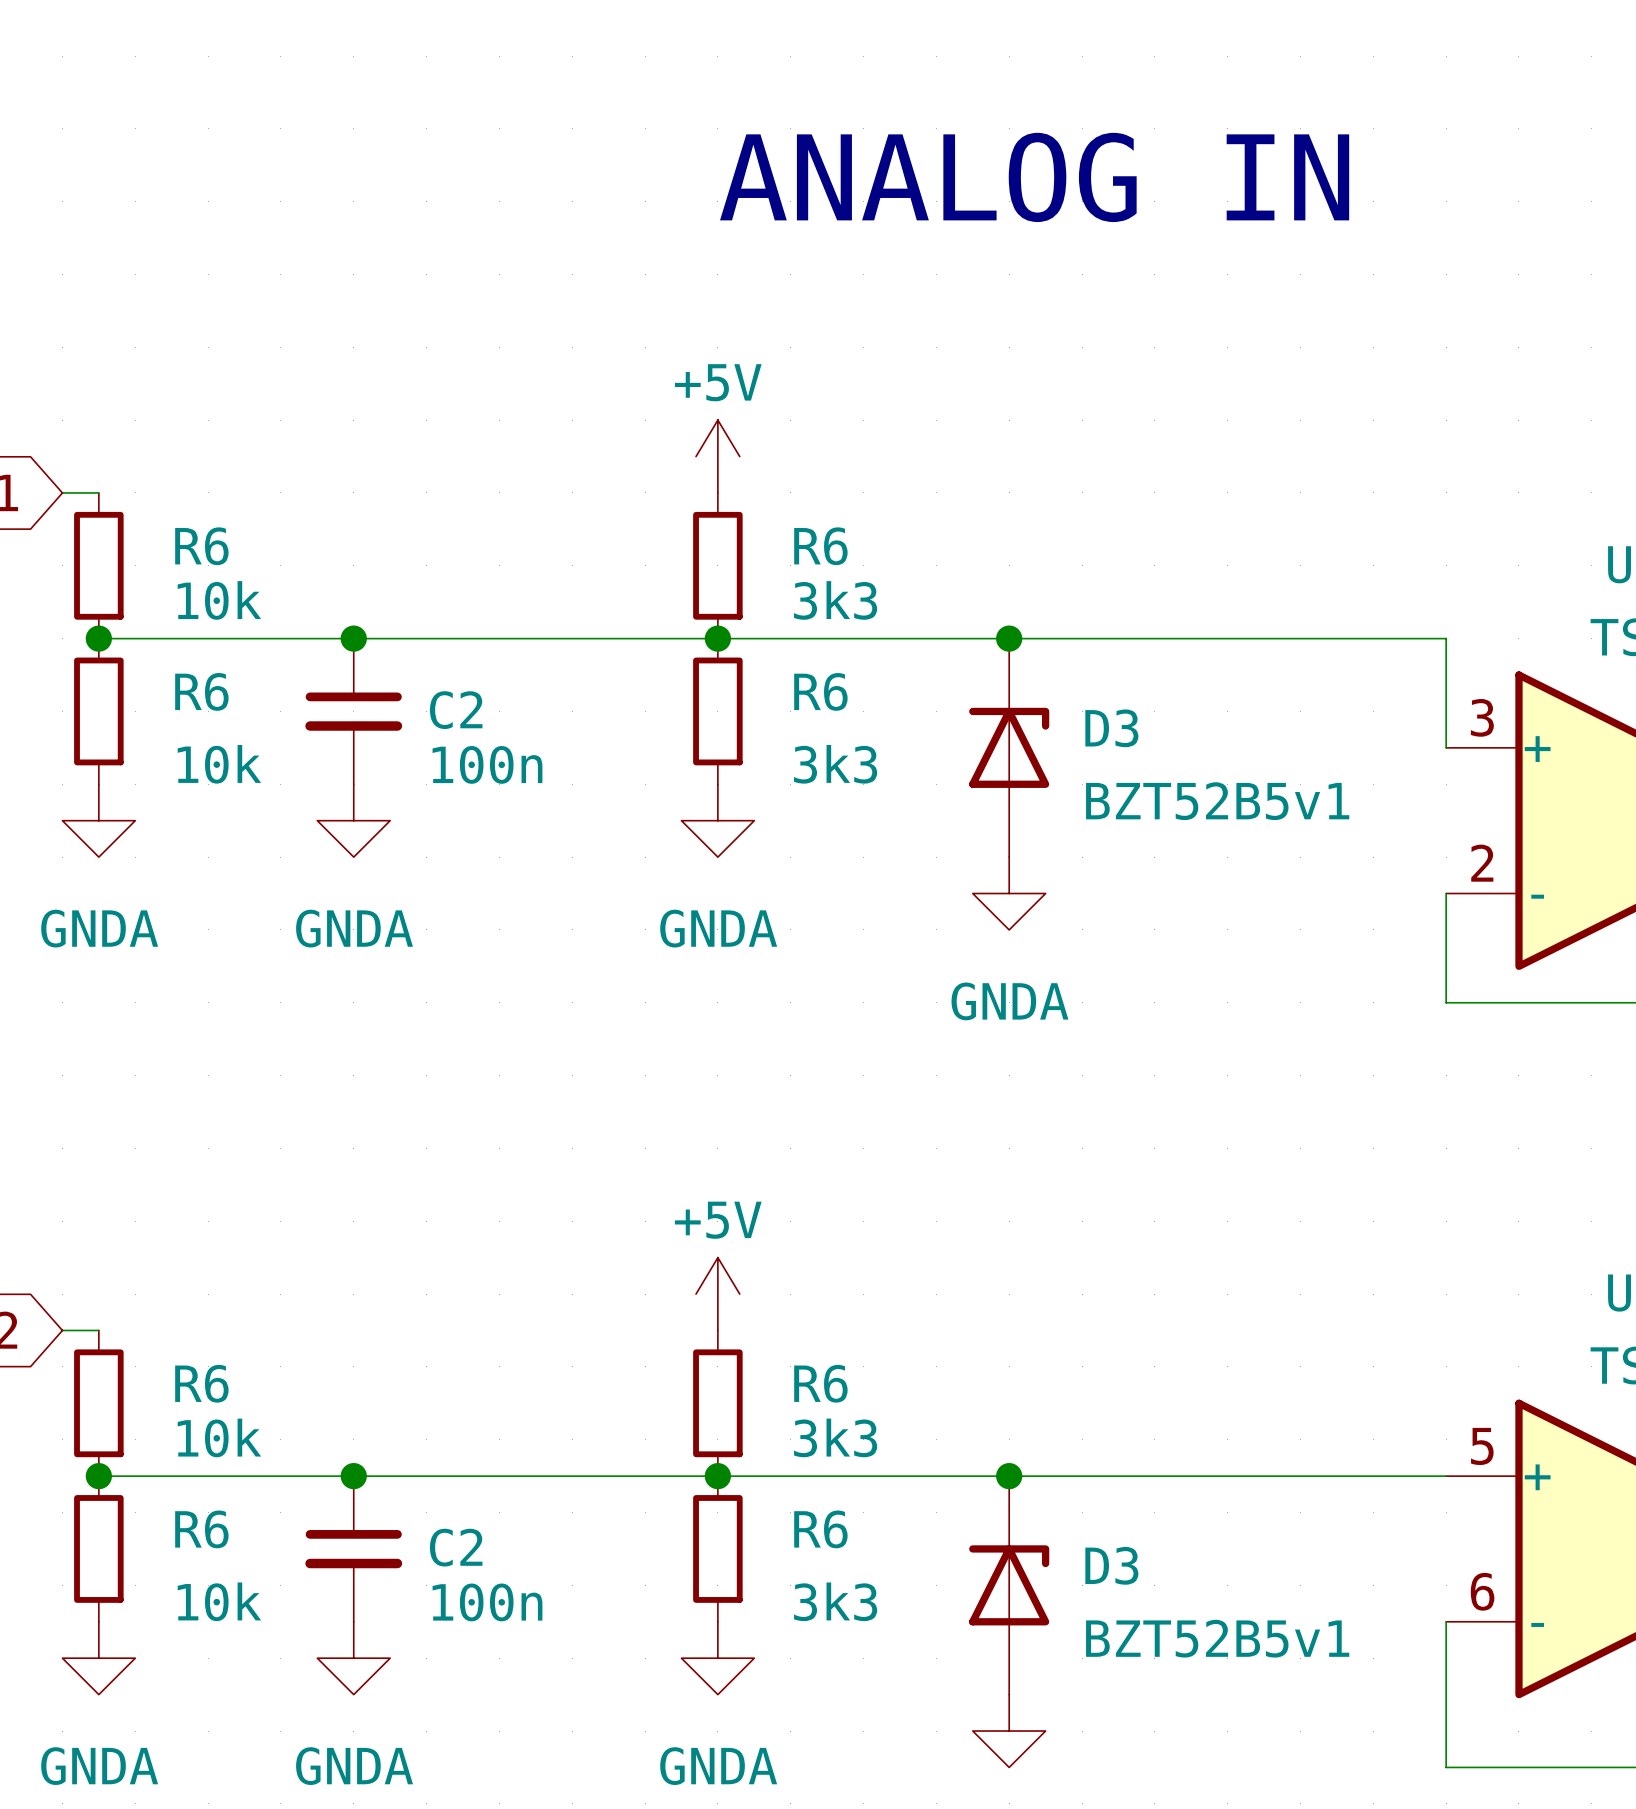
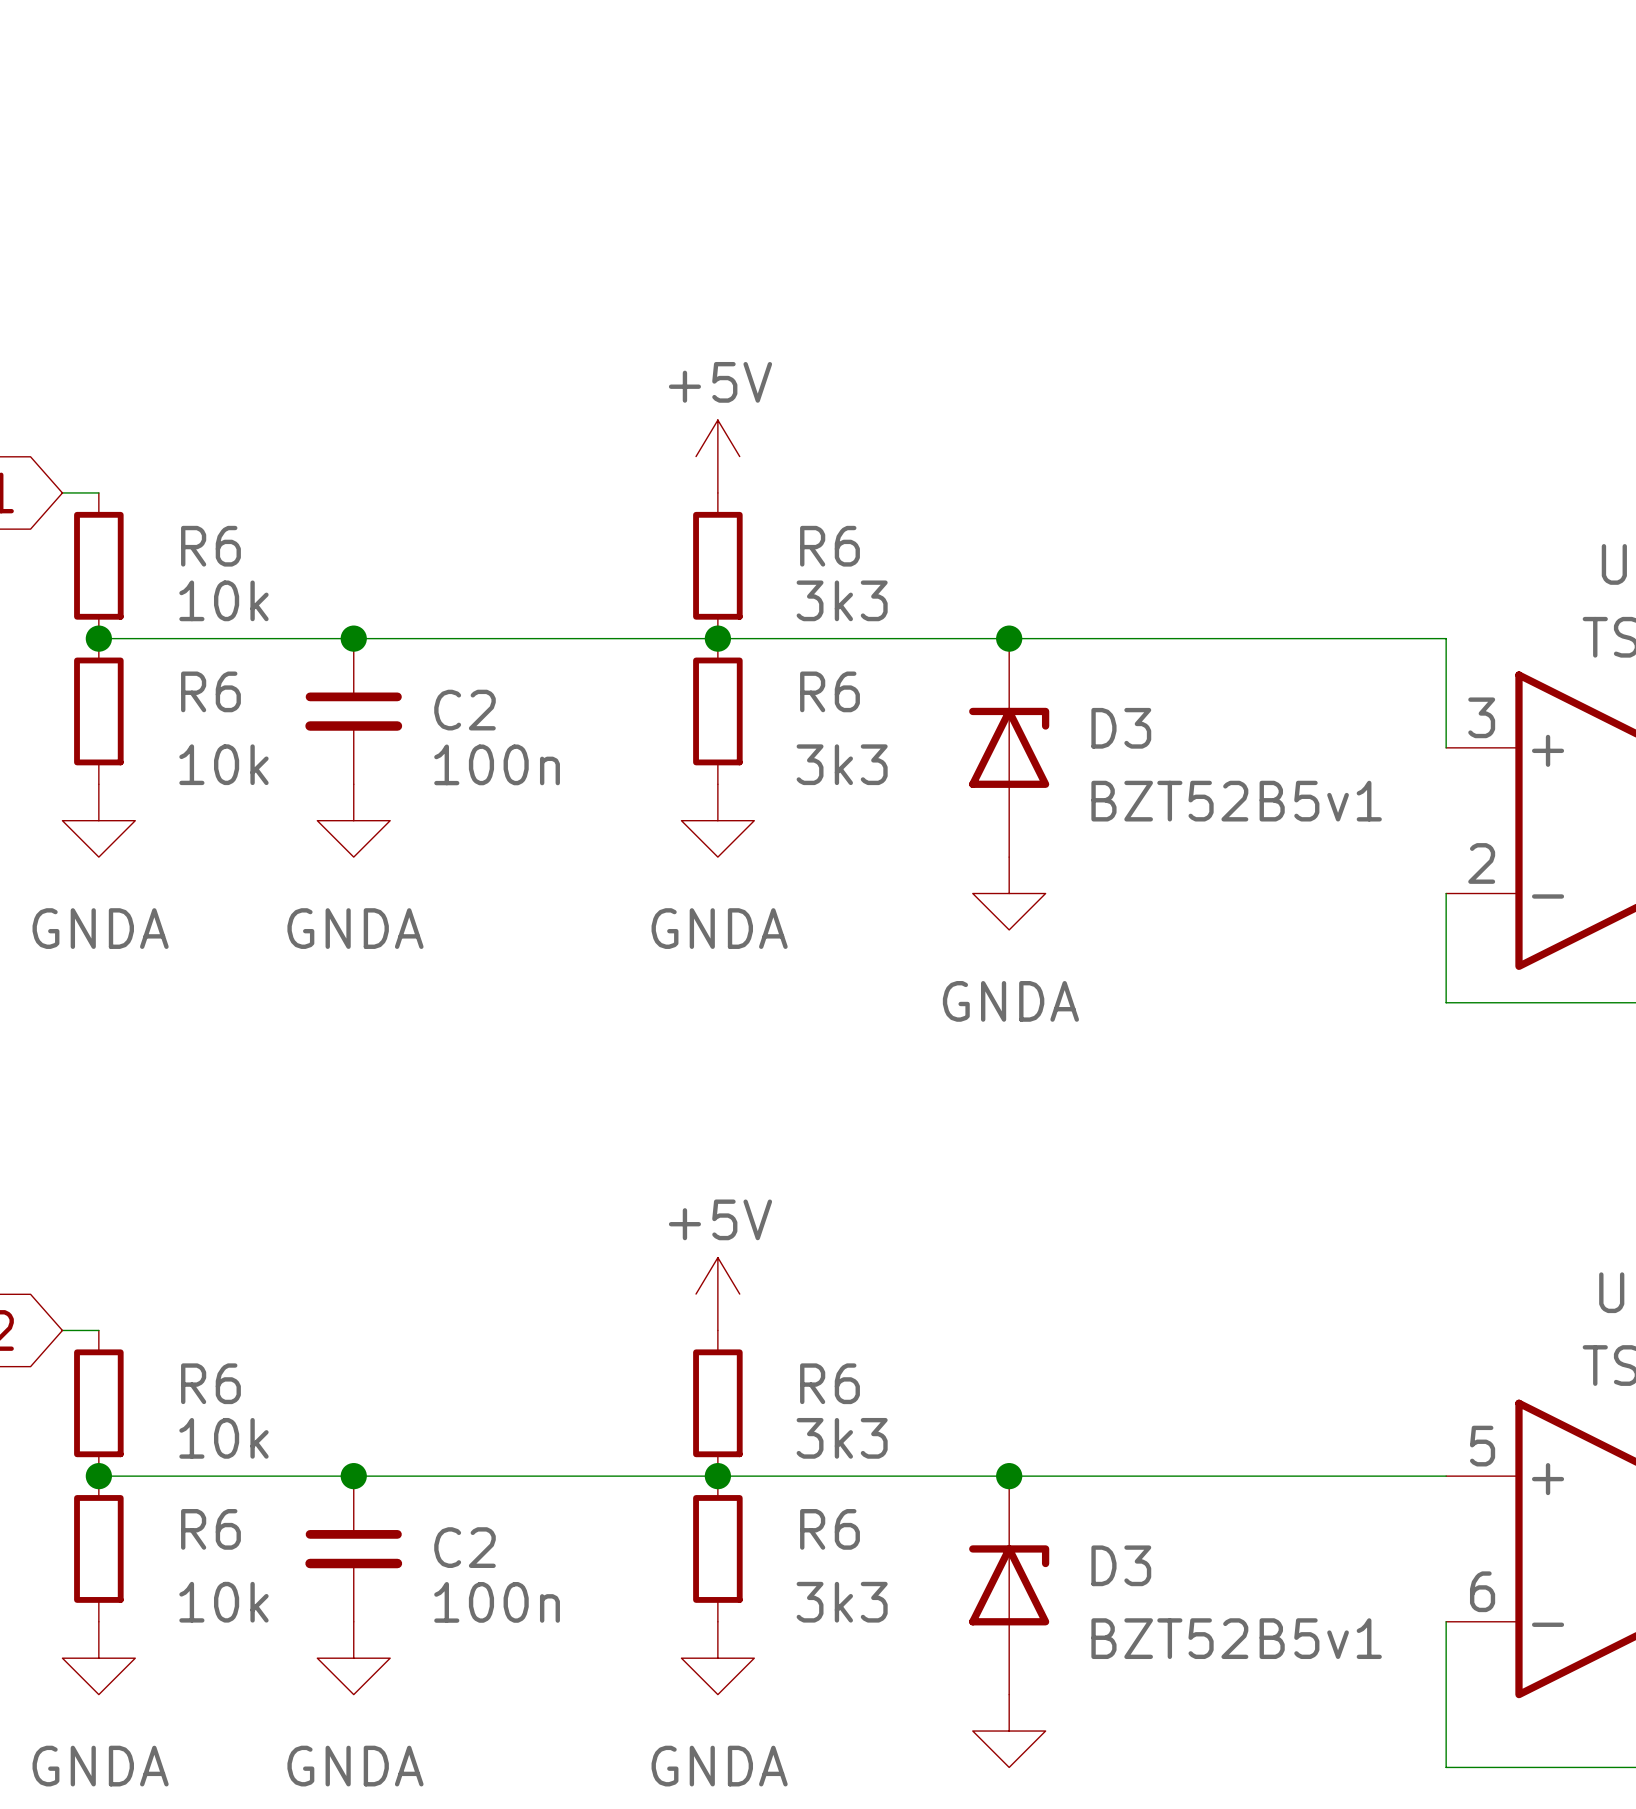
text: ANALOG IN (1034, 177) -> none

